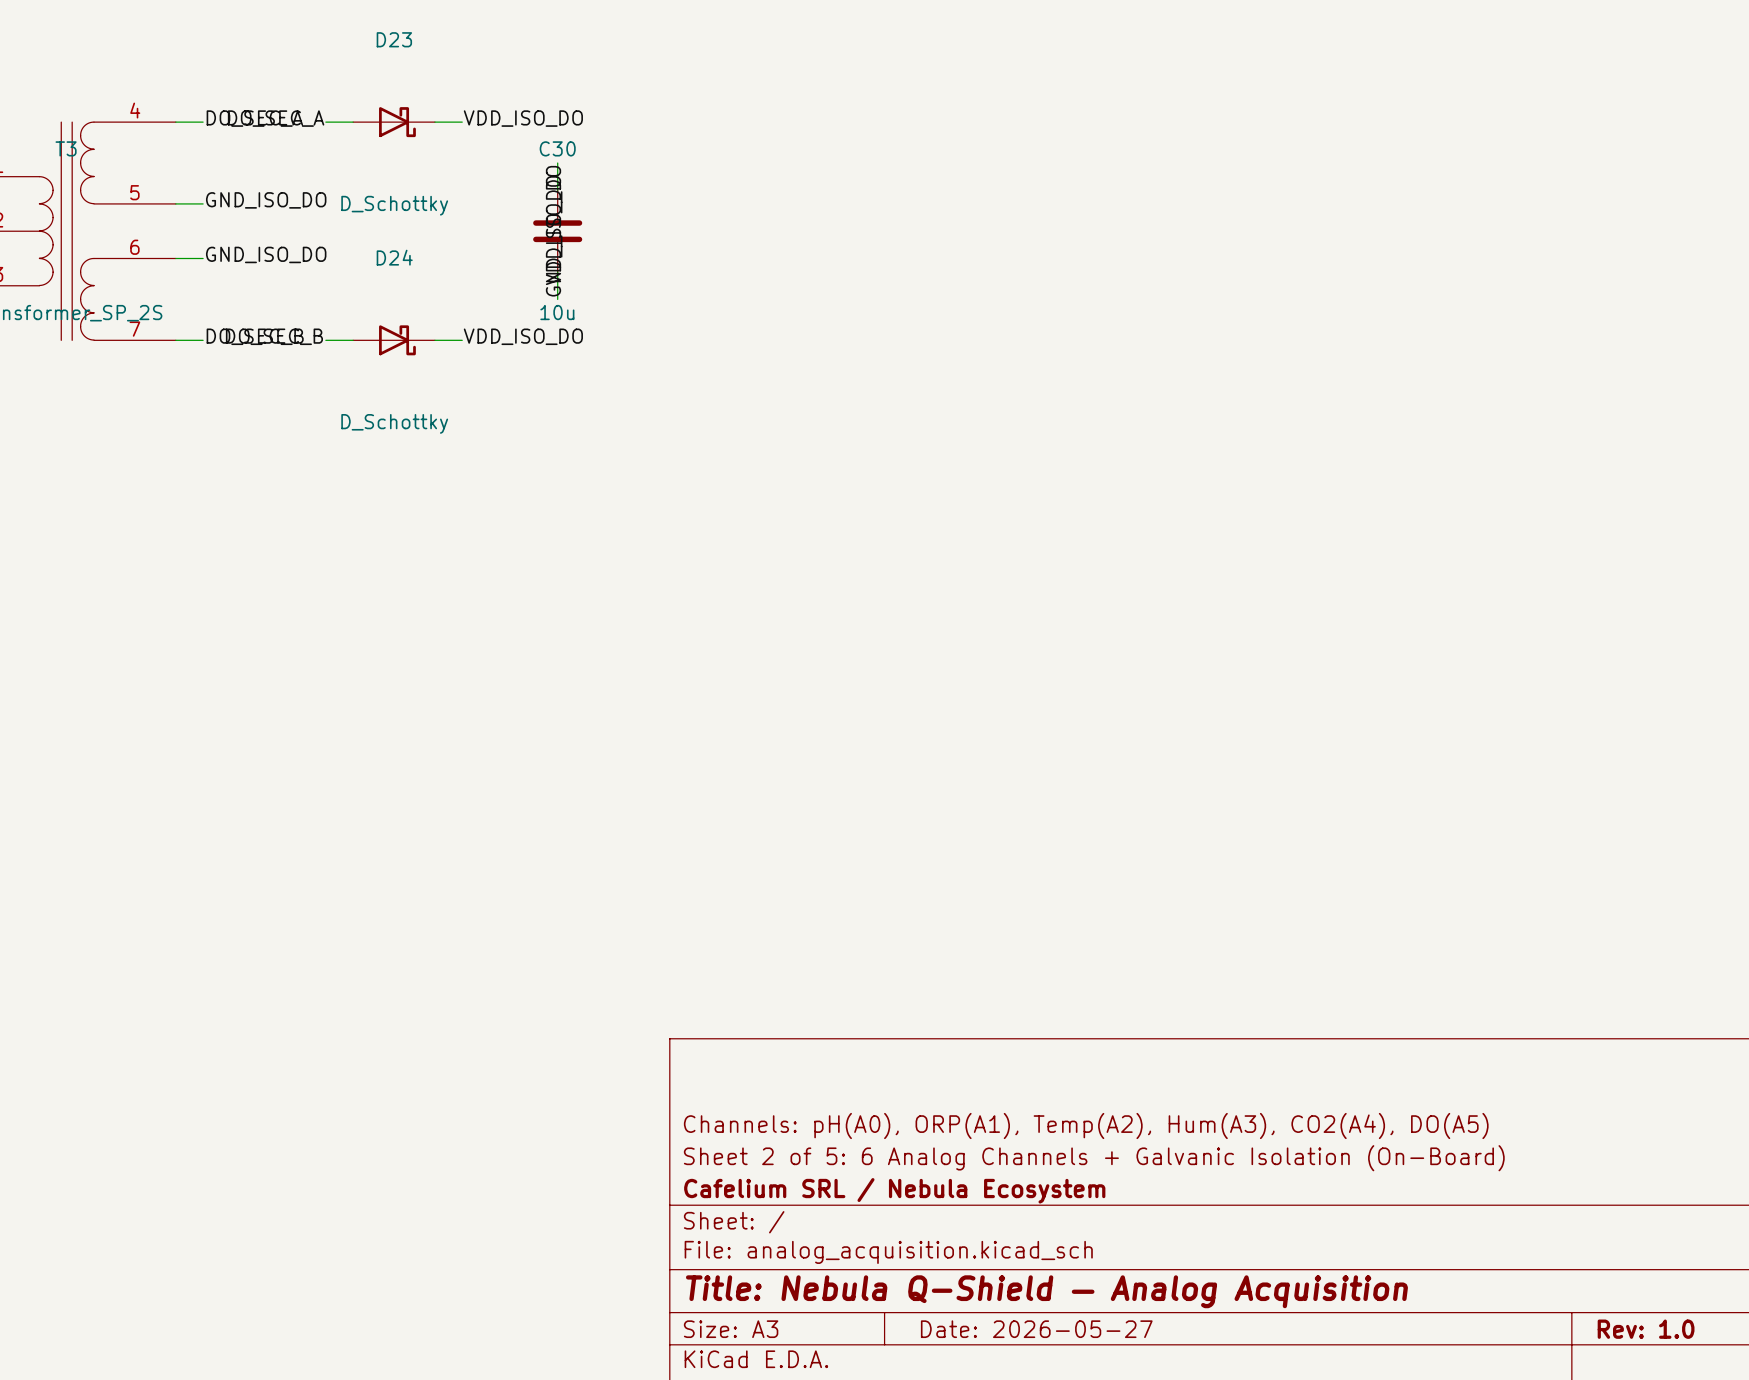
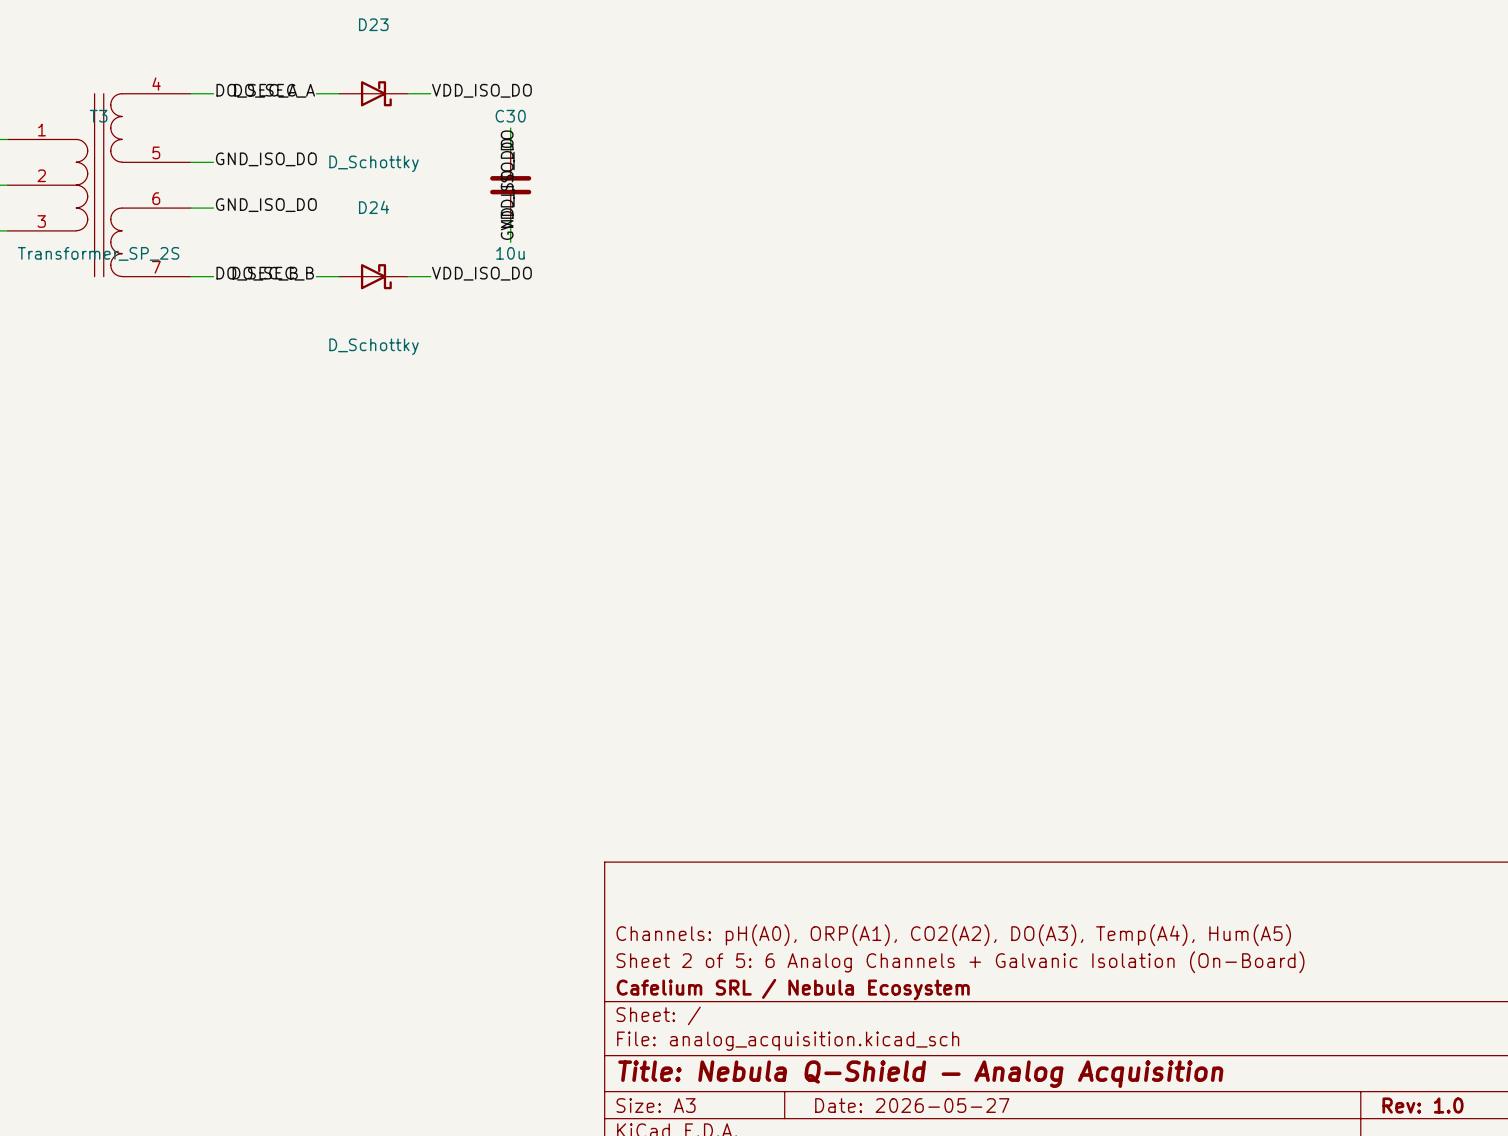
title block: Channels: pH(A0), ORP(A1), Temp(A2), Hum(A3), CO2(A4), DO(A5) (1086, 1125) -> Channels: pH(A0), ORP(A1), CO2(A2), DO(A3), Temp(A4), Hum(A5) (953, 935)

